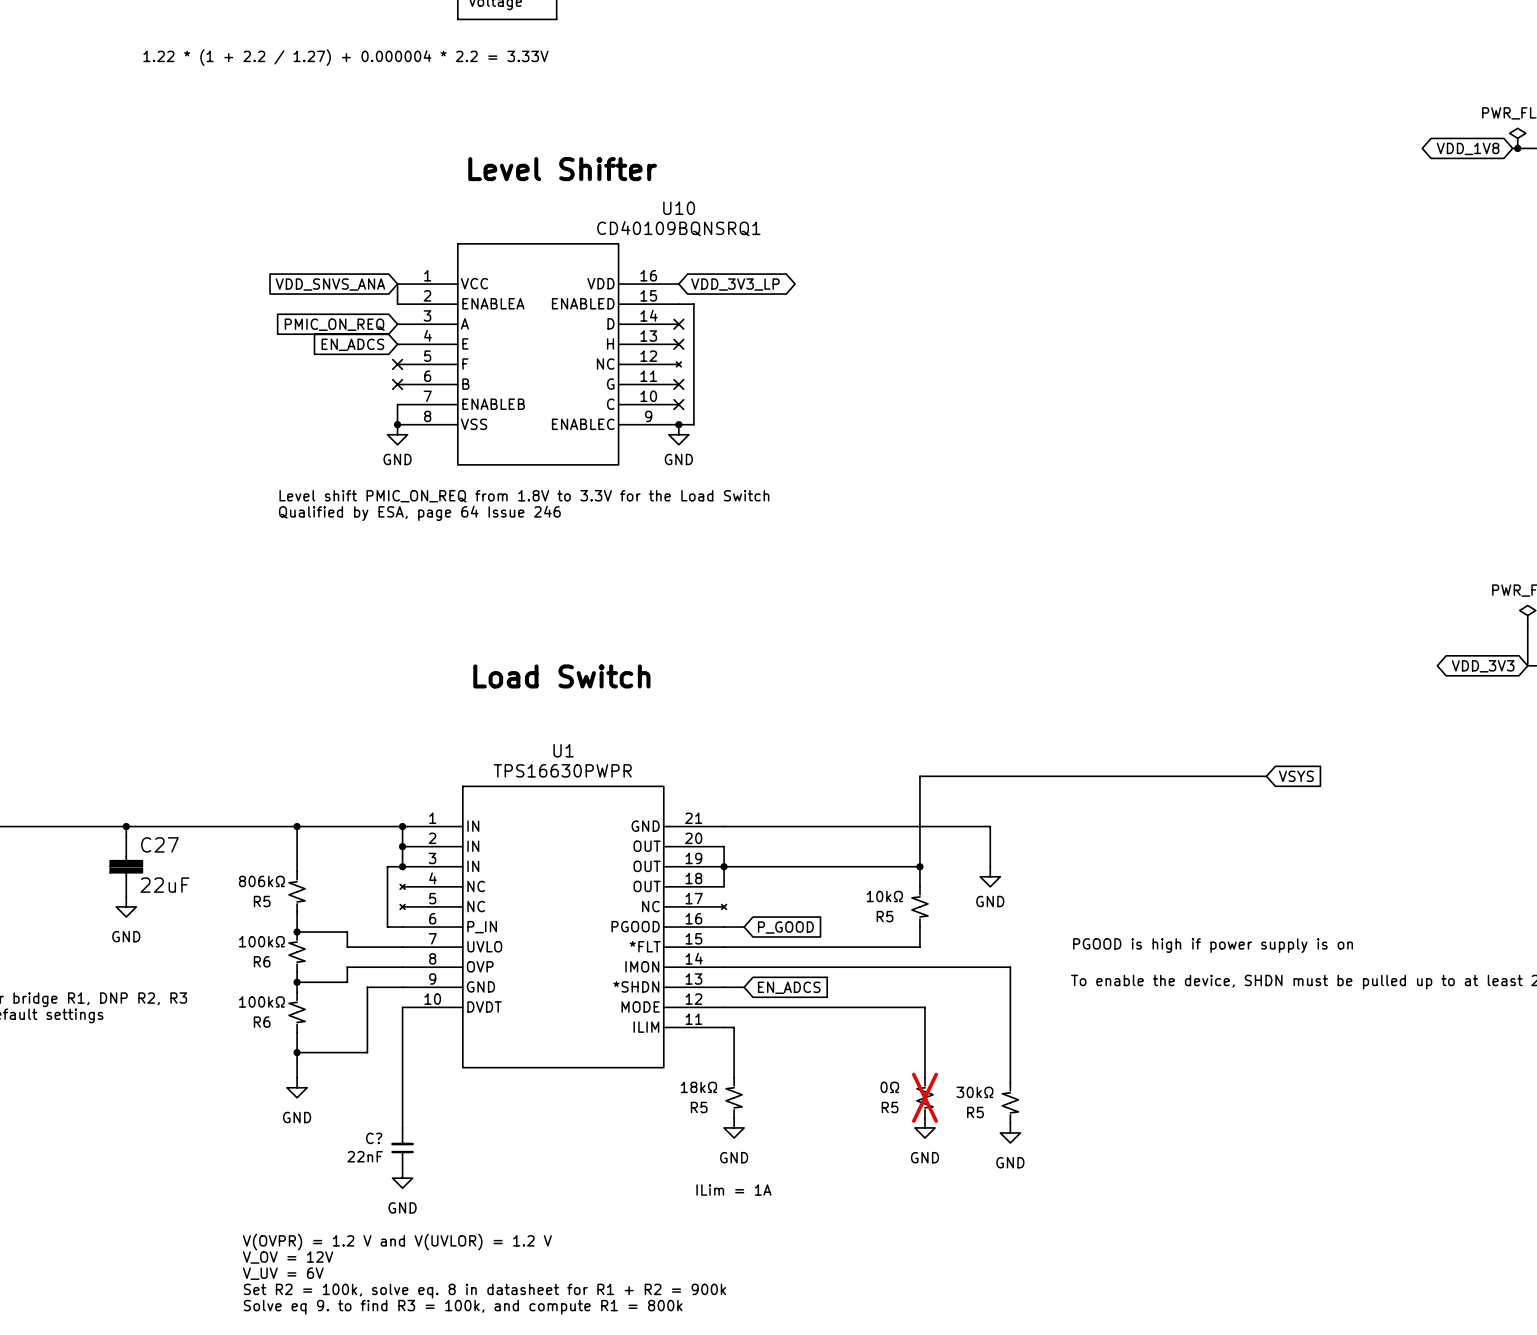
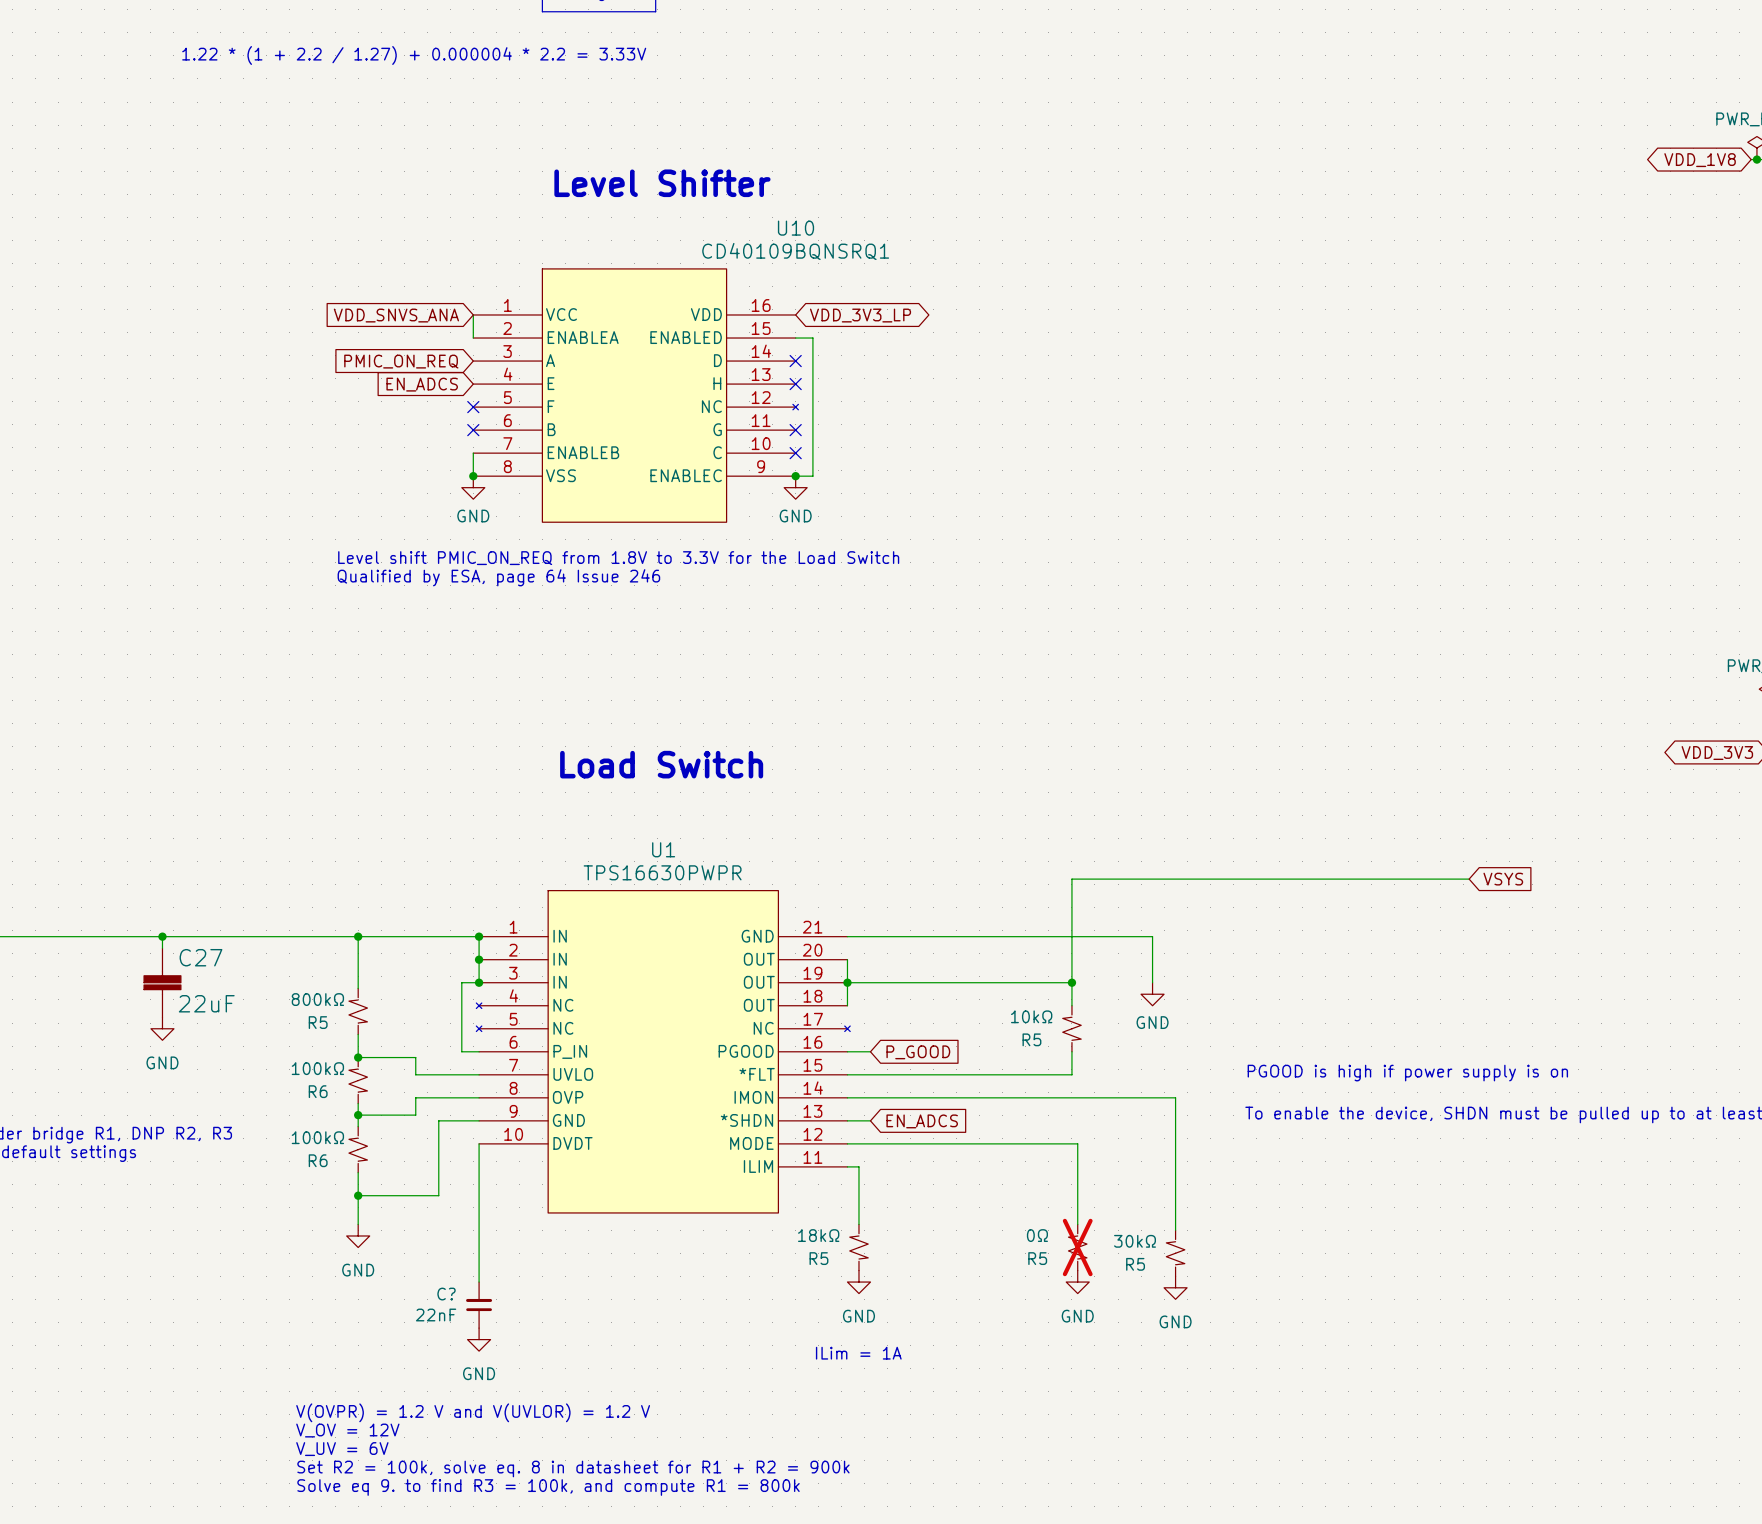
R5 value: 806kΩ (261, 881) -> 800kΩ (317, 999)

